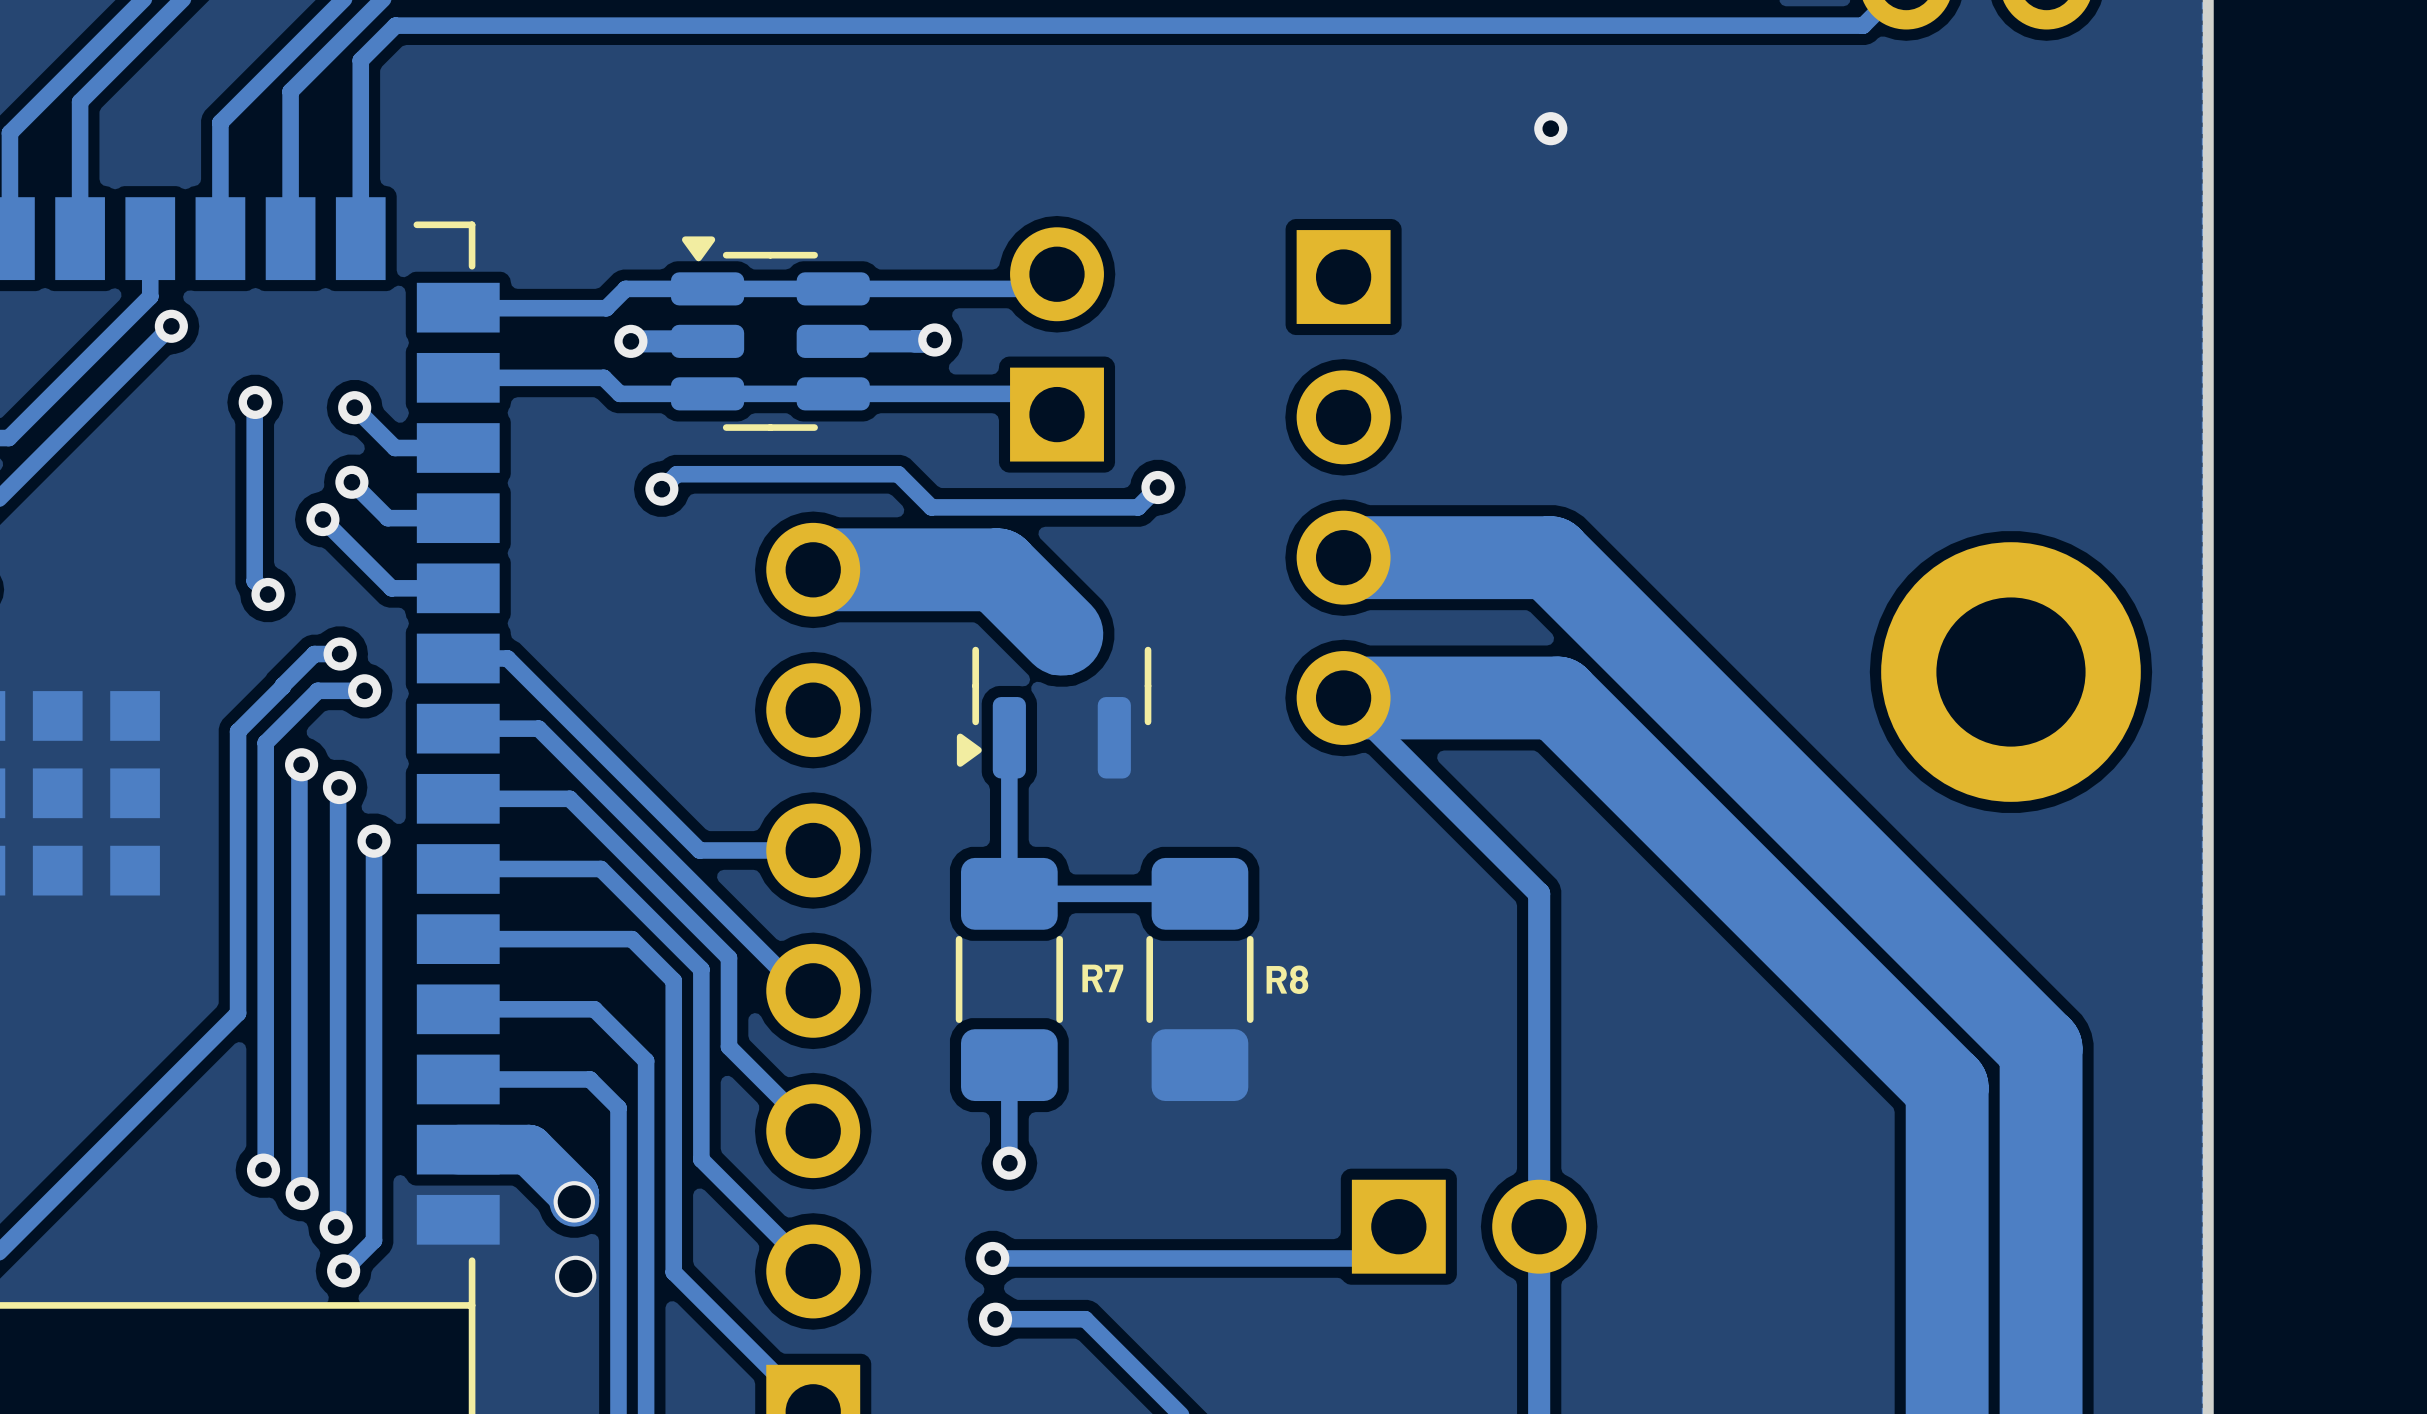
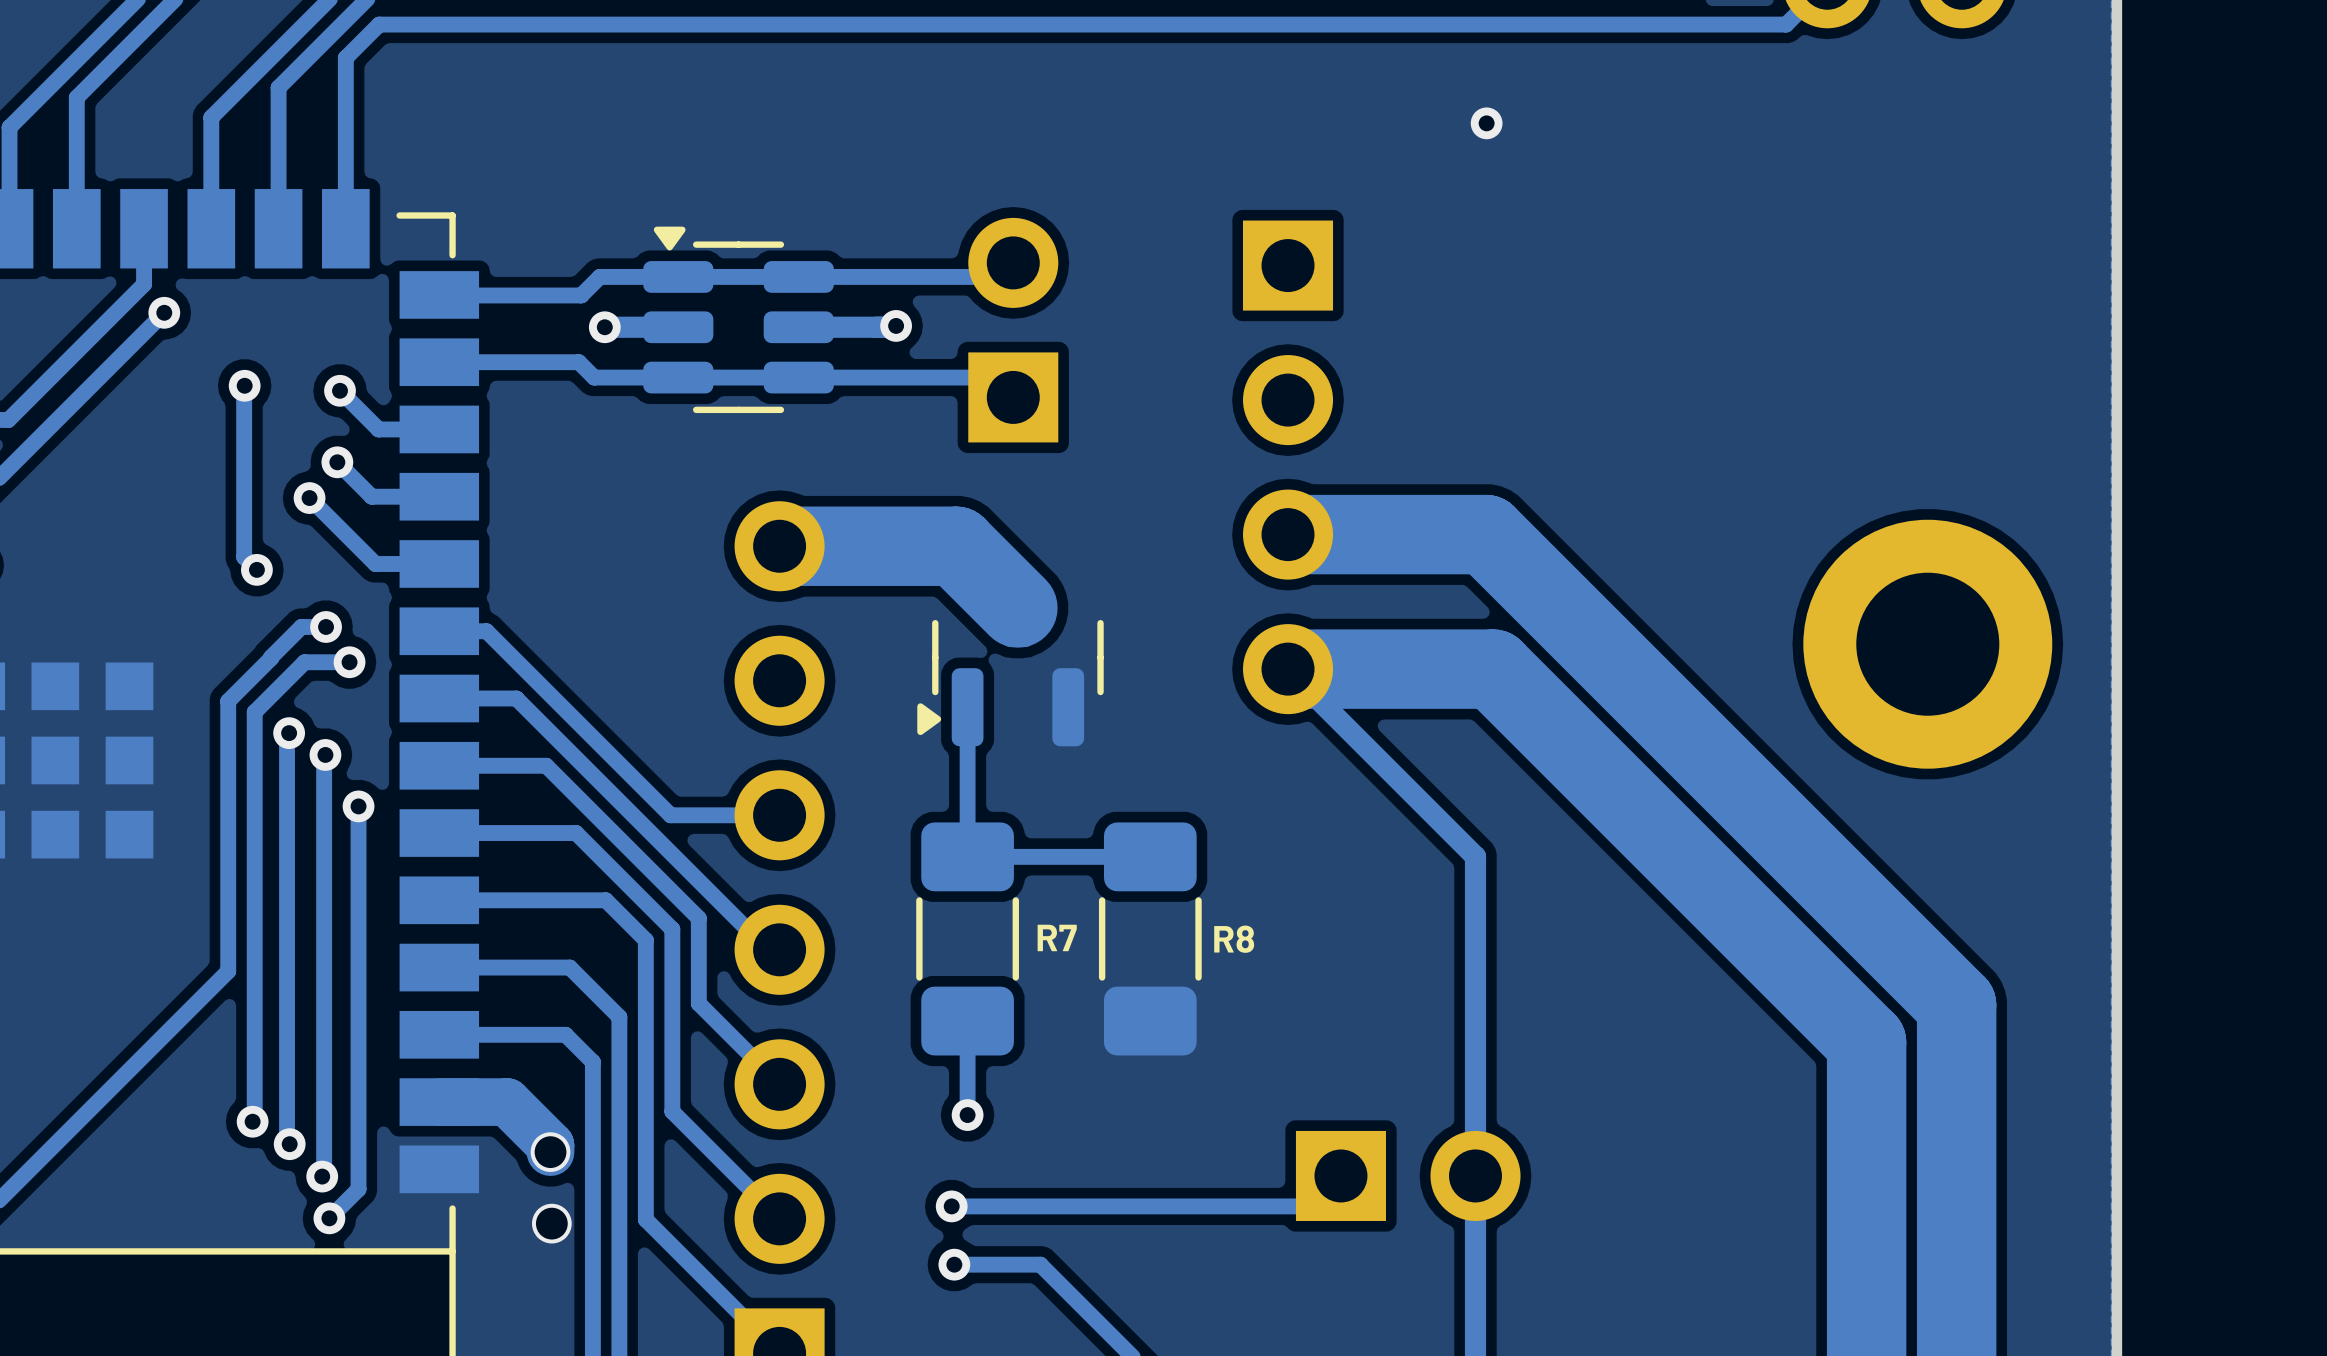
track: (1157, 487) (1138, 507) (931, 507) (898, 474) (676, 474) (661, 489) -> none
via: (1157, 487) -> none
via: (661, 489) -> none

